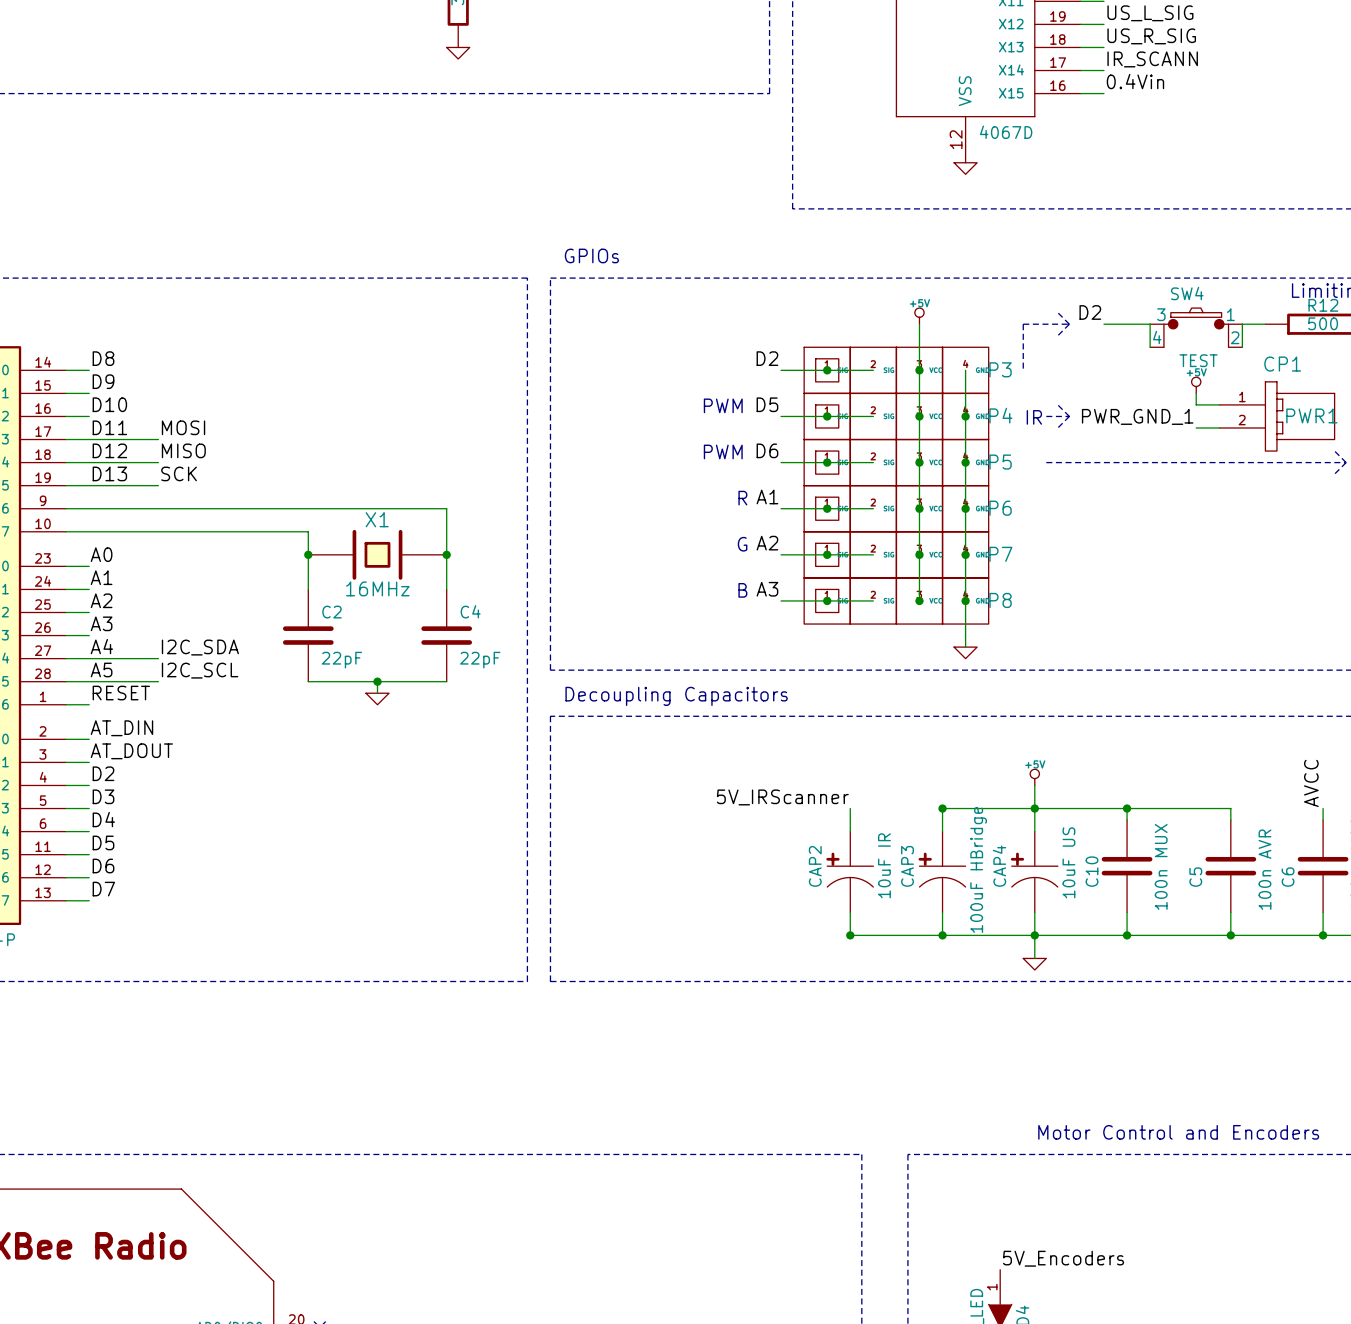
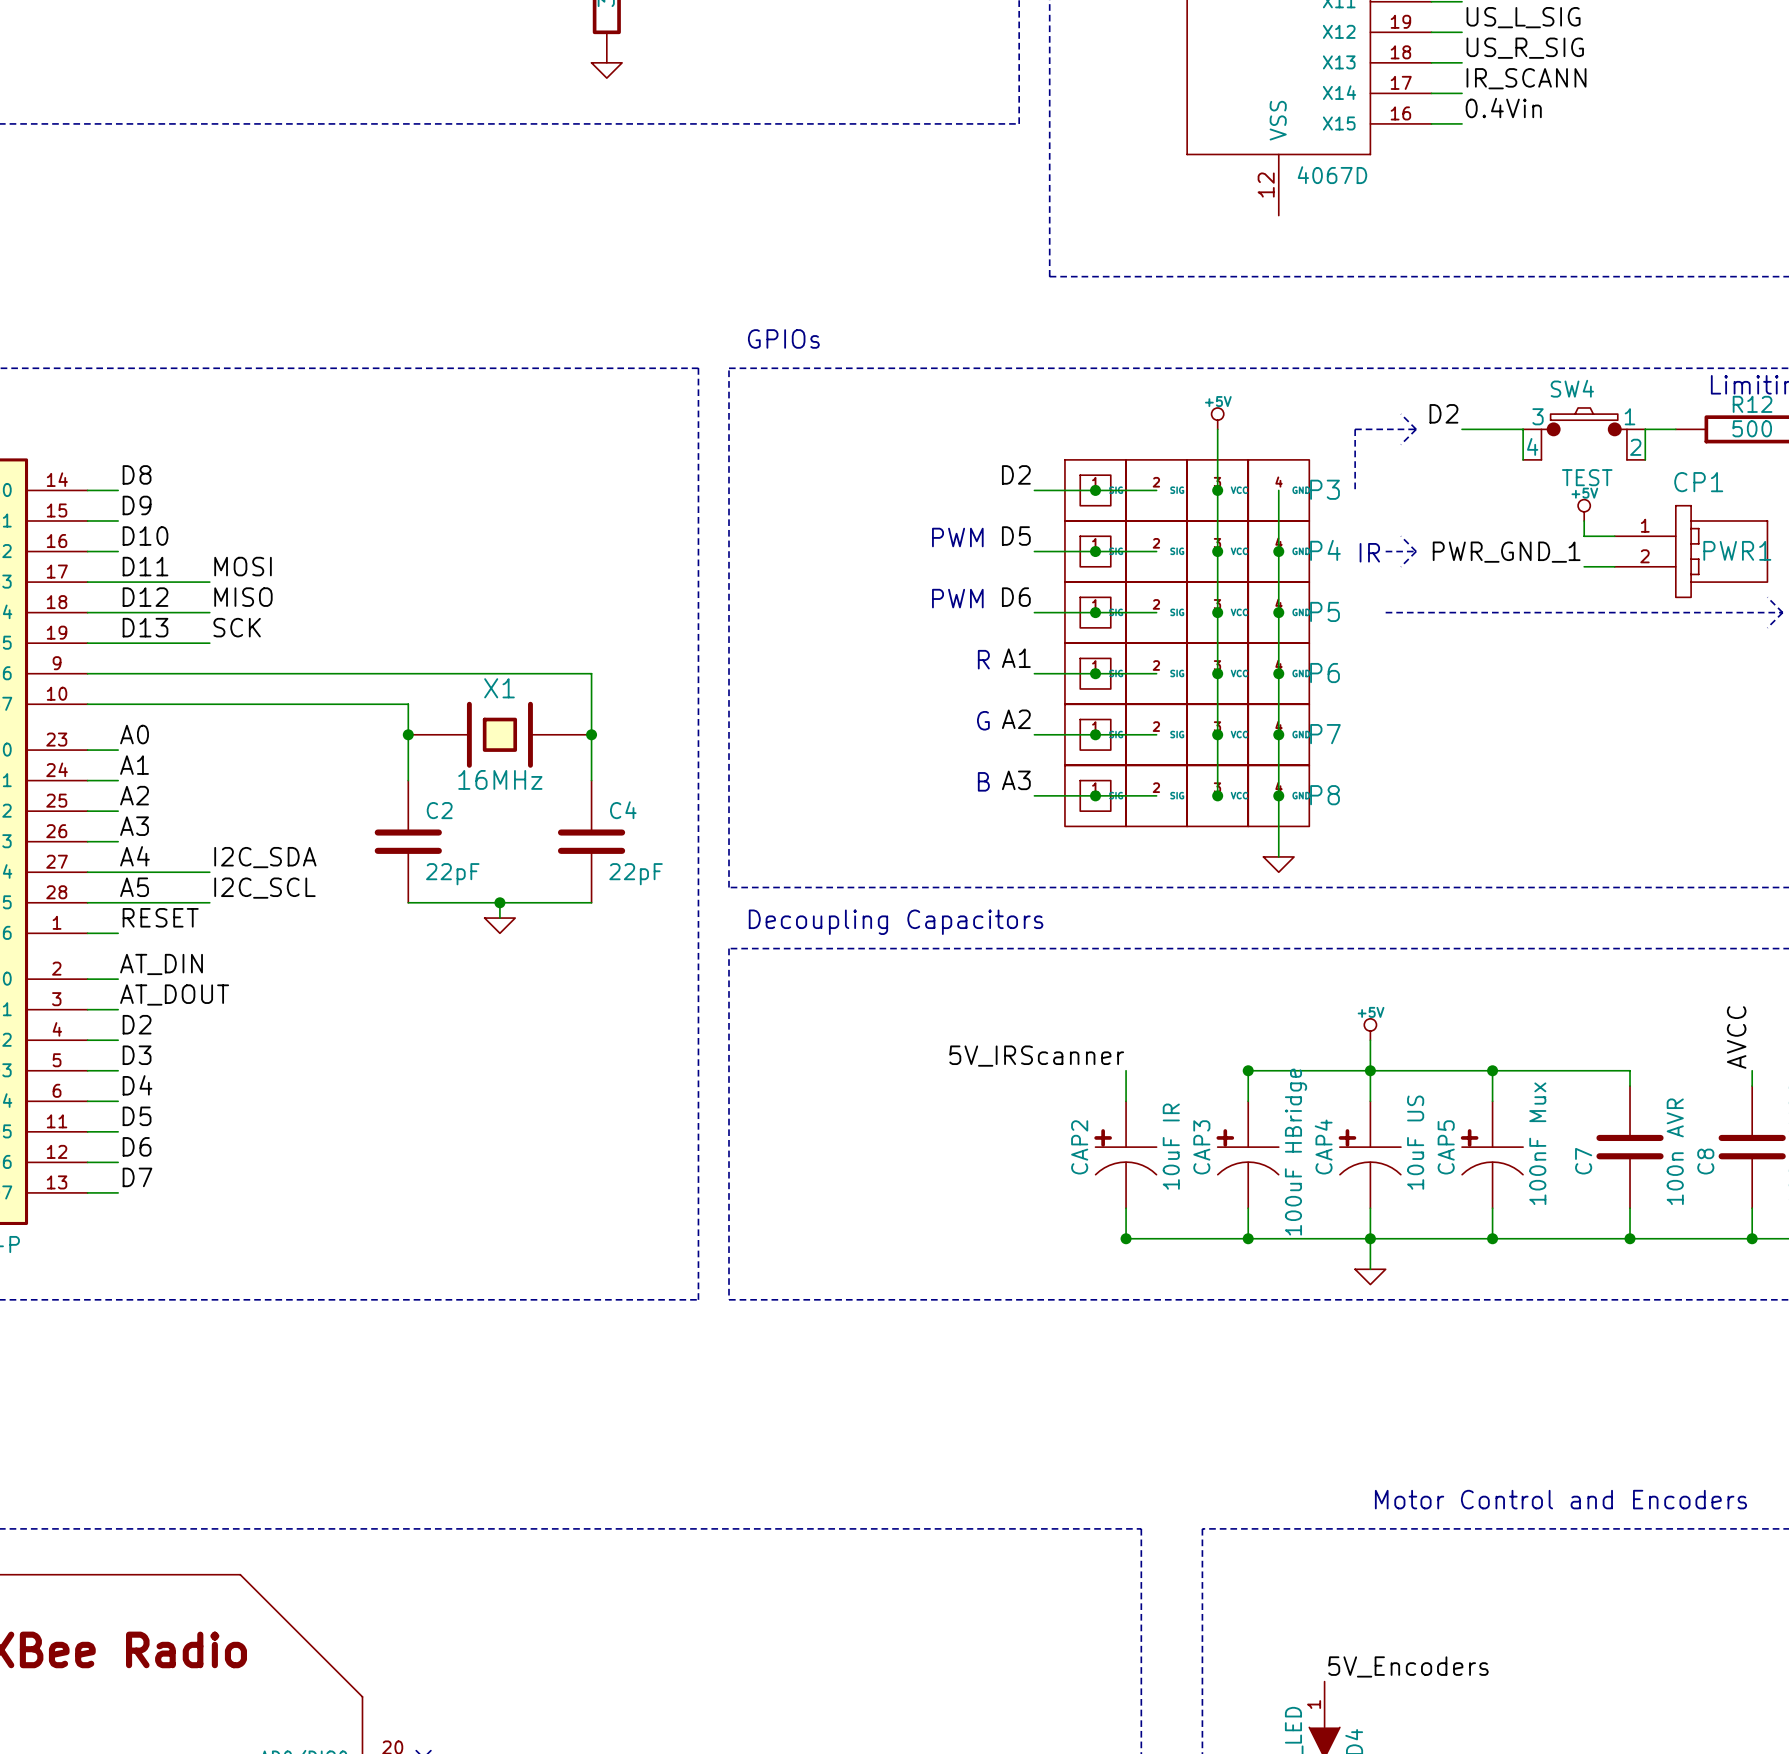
power symbol: (965, 168) -> none
C10: 100n MUX (1127, 866) -> none
CAP5: none -> 100nF Mux (1492, 1154)
C5 name: C5 (1195, 877) -> C7 (1583, 1161)
C6 name: C6 (1288, 877) -> C8 (1705, 1161)

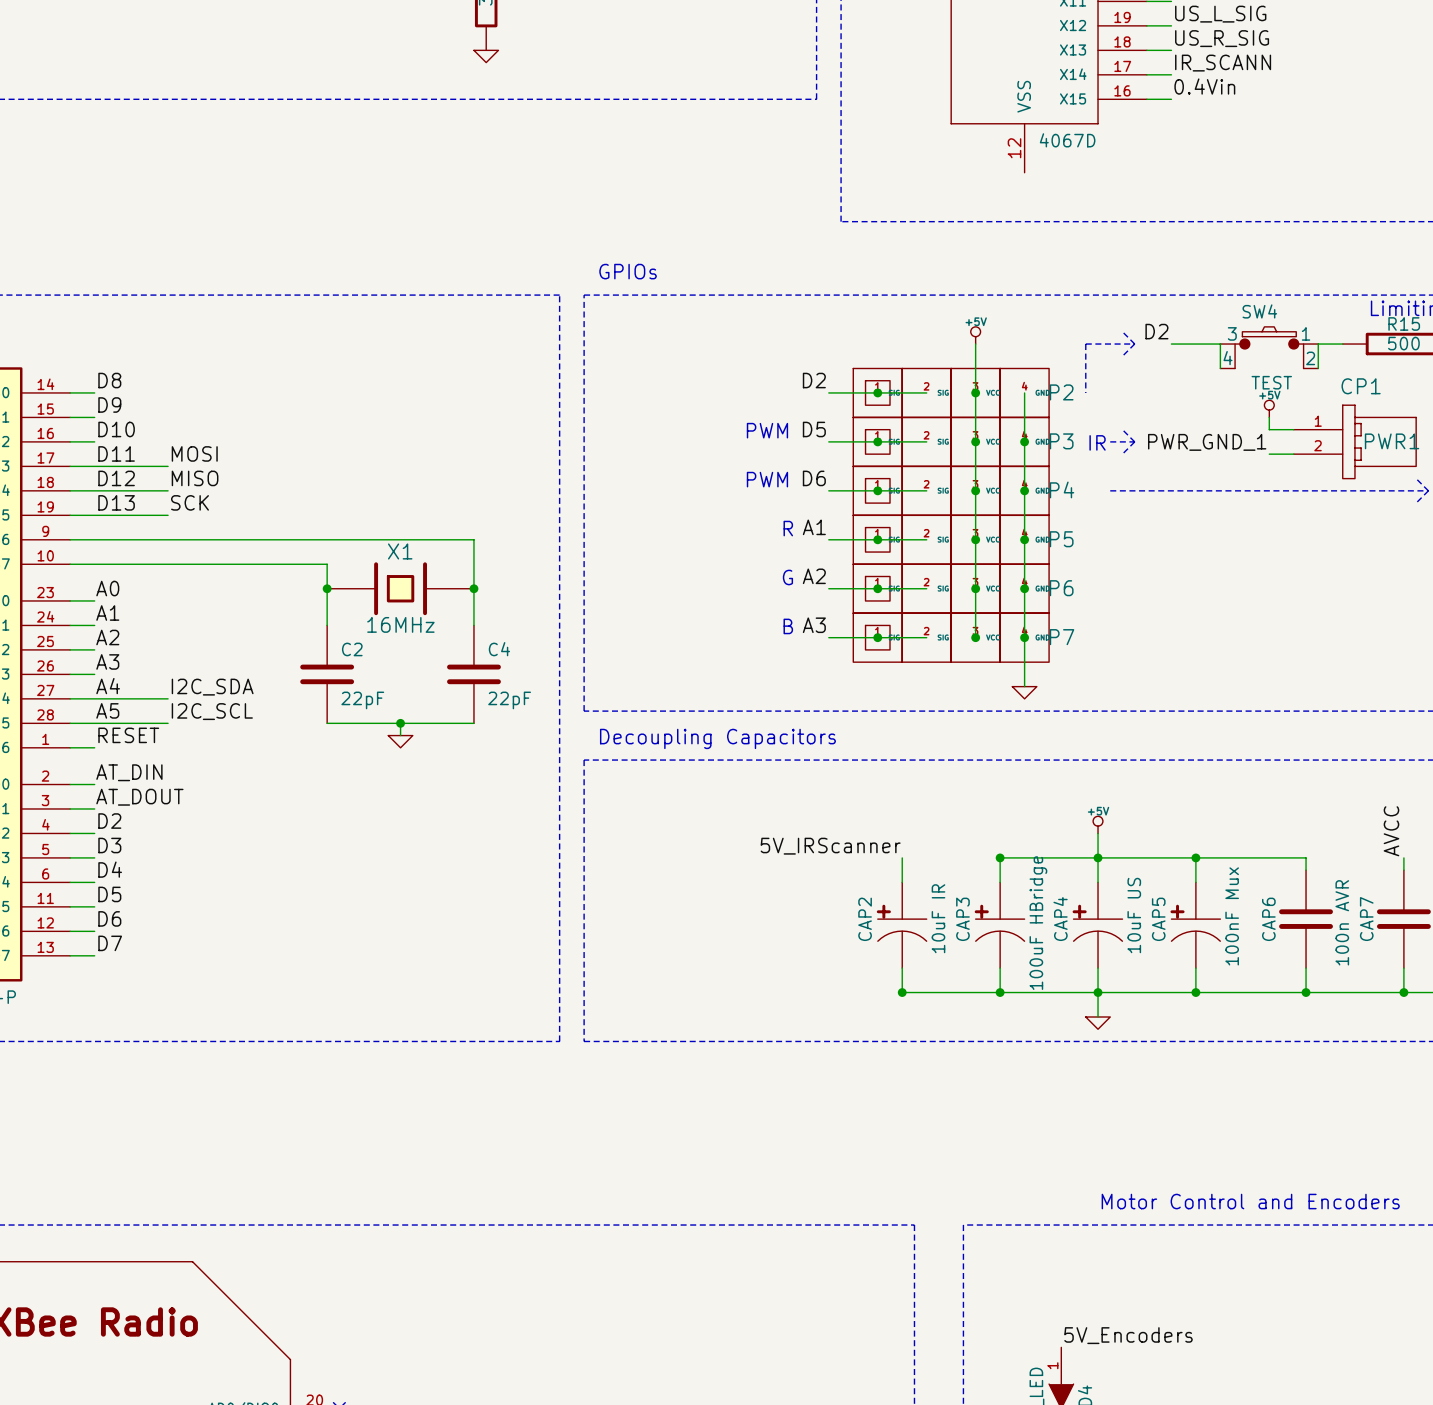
R12 name: R12 (1752, 404) -> R15 (1404, 323)
P3 name: P3 (1325, 489) -> P2 (1061, 392)
P4 name: P4 (1325, 550) -> P3 (1061, 441)
P5 name: P5 (1325, 611) -> P4 (1062, 489)
P6 name: P6 (1325, 673) -> P5 (1061, 539)
P7 name: P7 (1325, 734) -> P6 (1061, 588)
P8 name: P8 (1325, 795) -> P7 (1062, 637)
C7 name: C7 (1583, 1161) -> CAP6 (1268, 919)
C8 name: C8 (1705, 1161) -> CAP7 (1366, 919)

